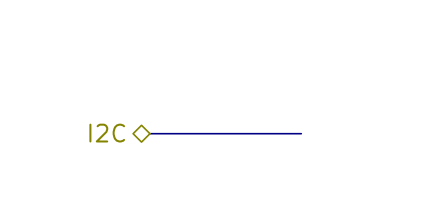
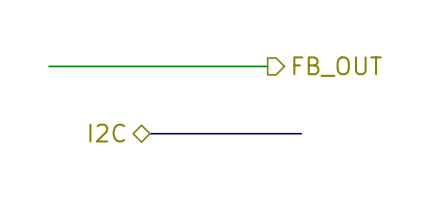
wire: none -> (49, 66) (267, 66)
hierarchical label: none -> FB_OUT (337, 66)

